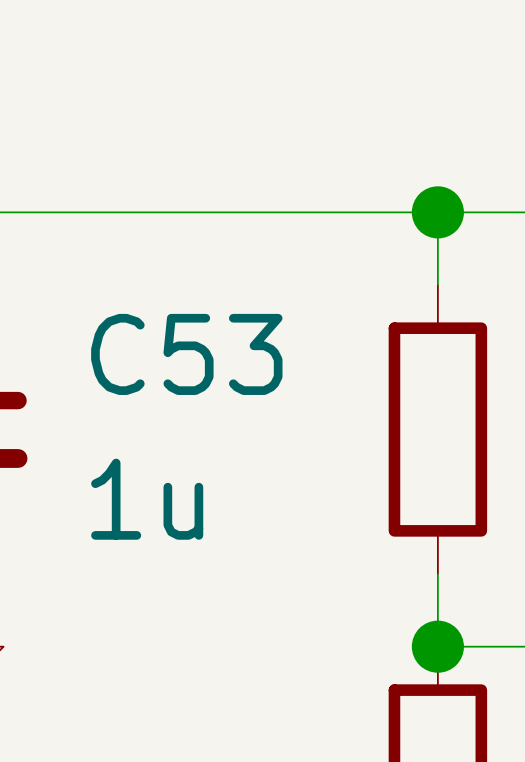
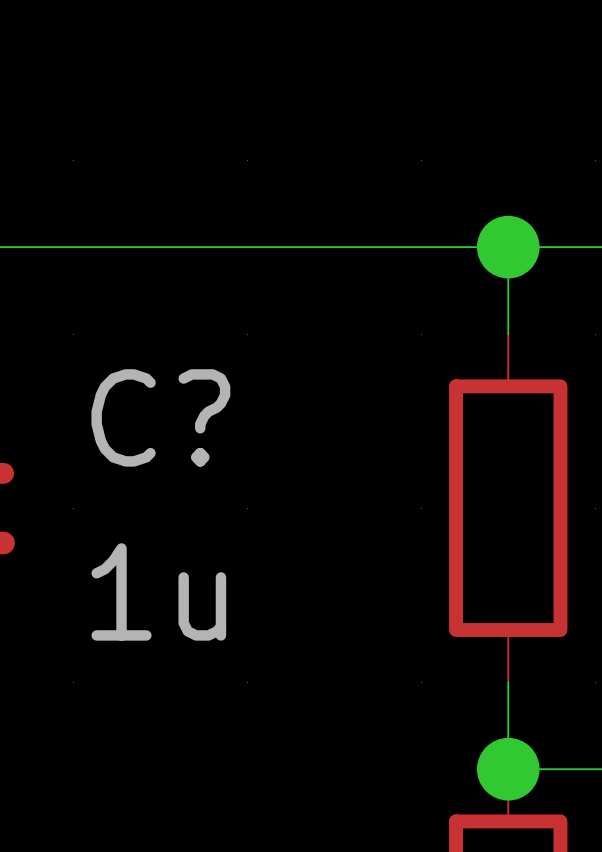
C53 name: C53 (186, 354) -> C? (160, 417)

